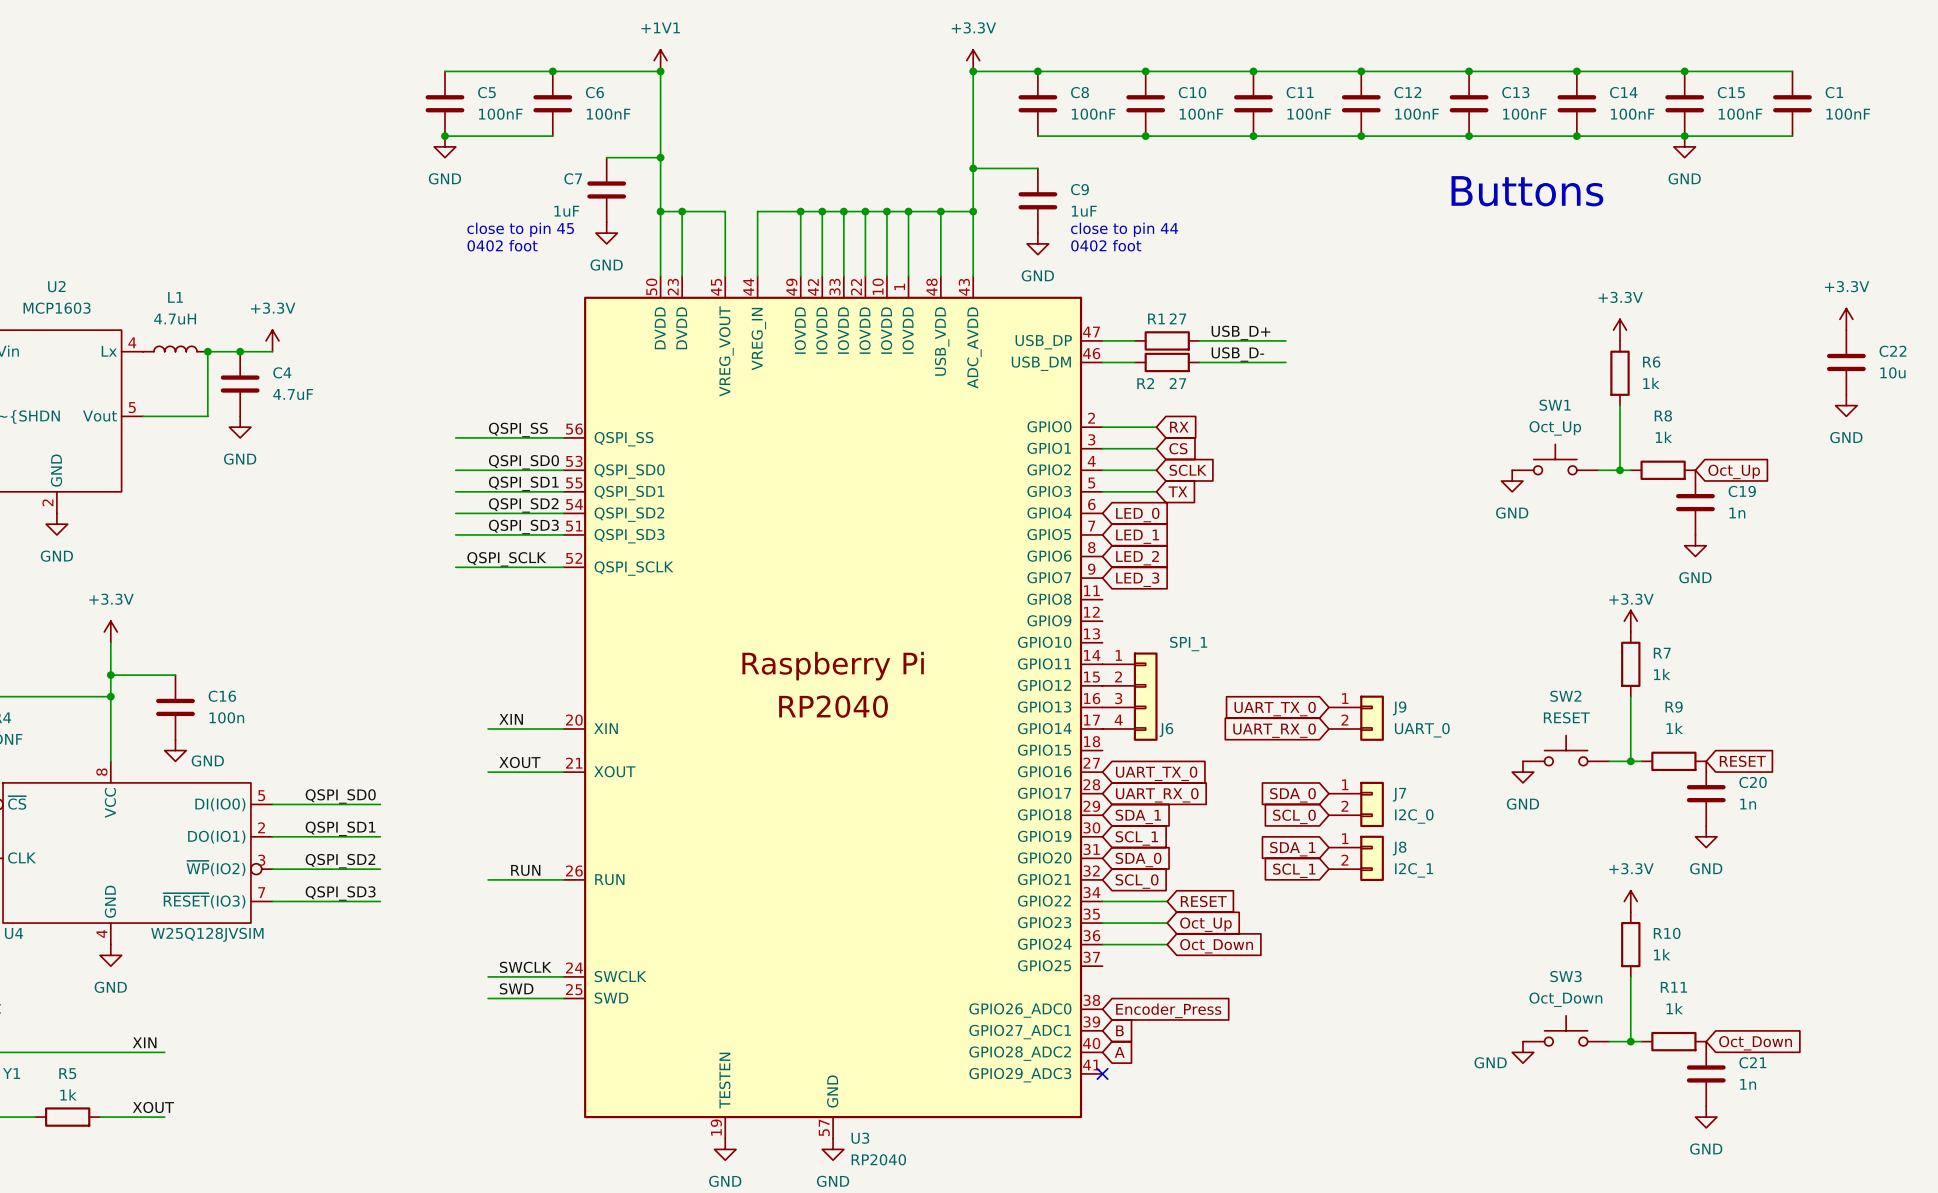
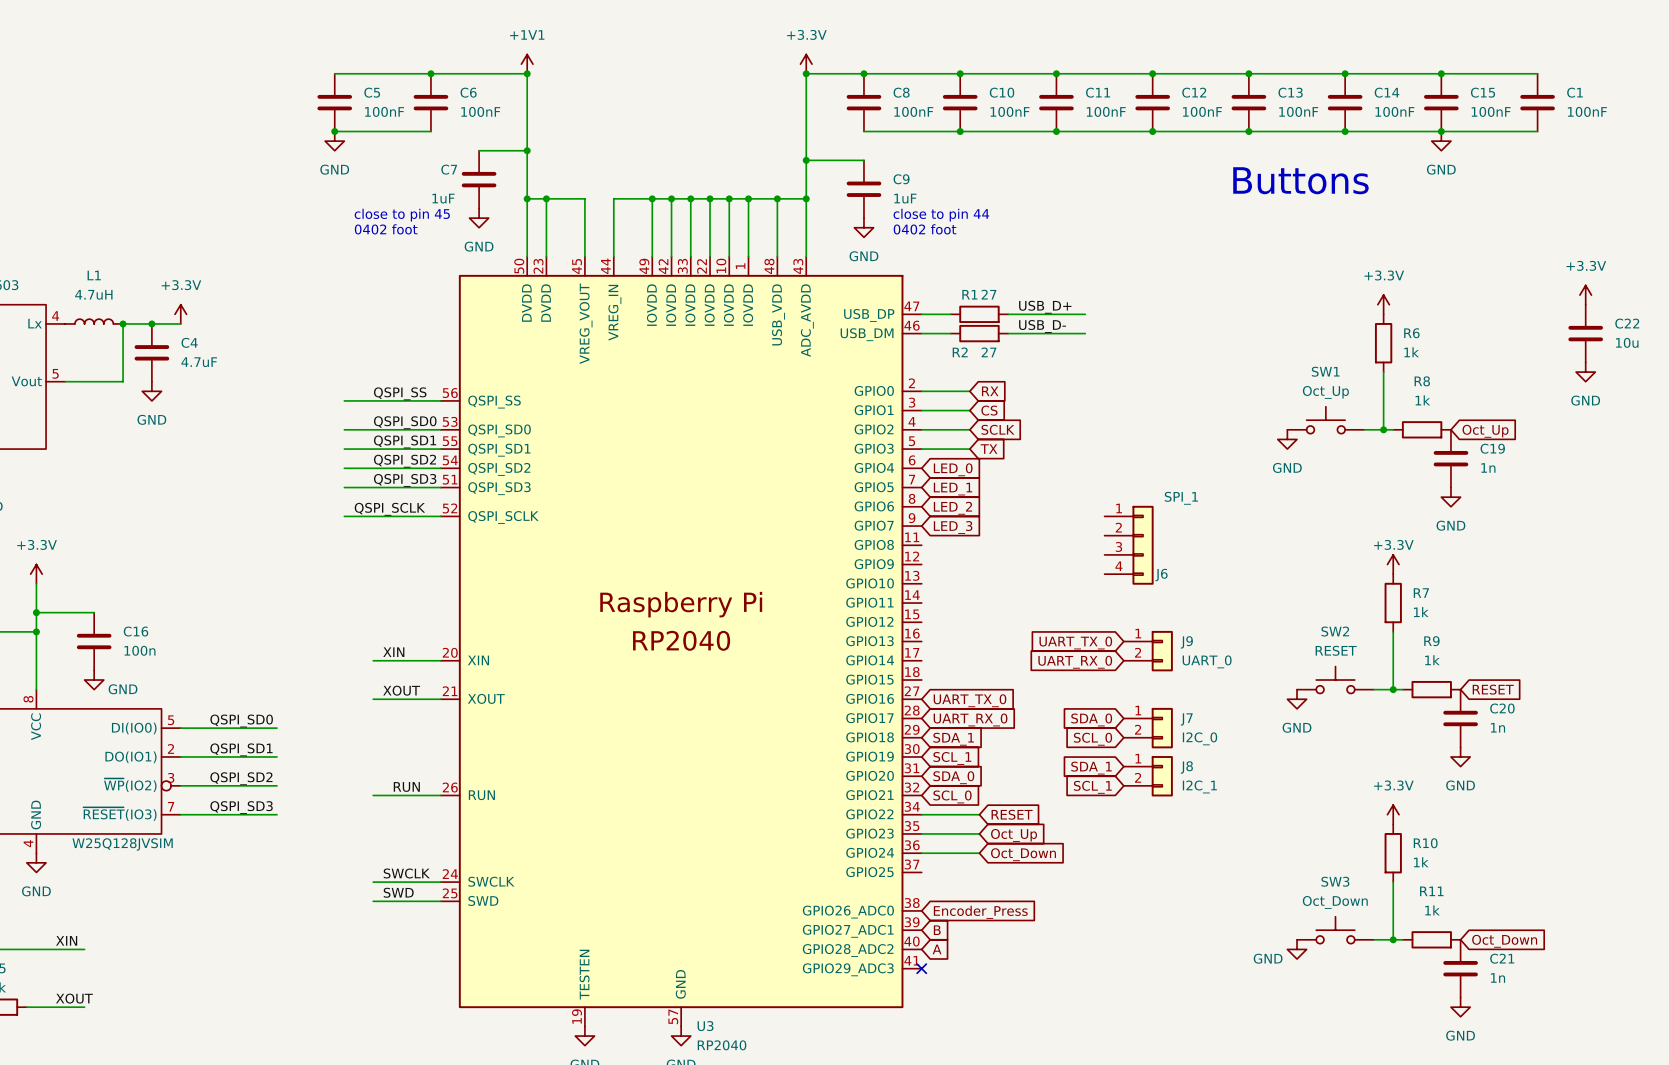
J6 position: (1130, 696) -> (1129, 545)

